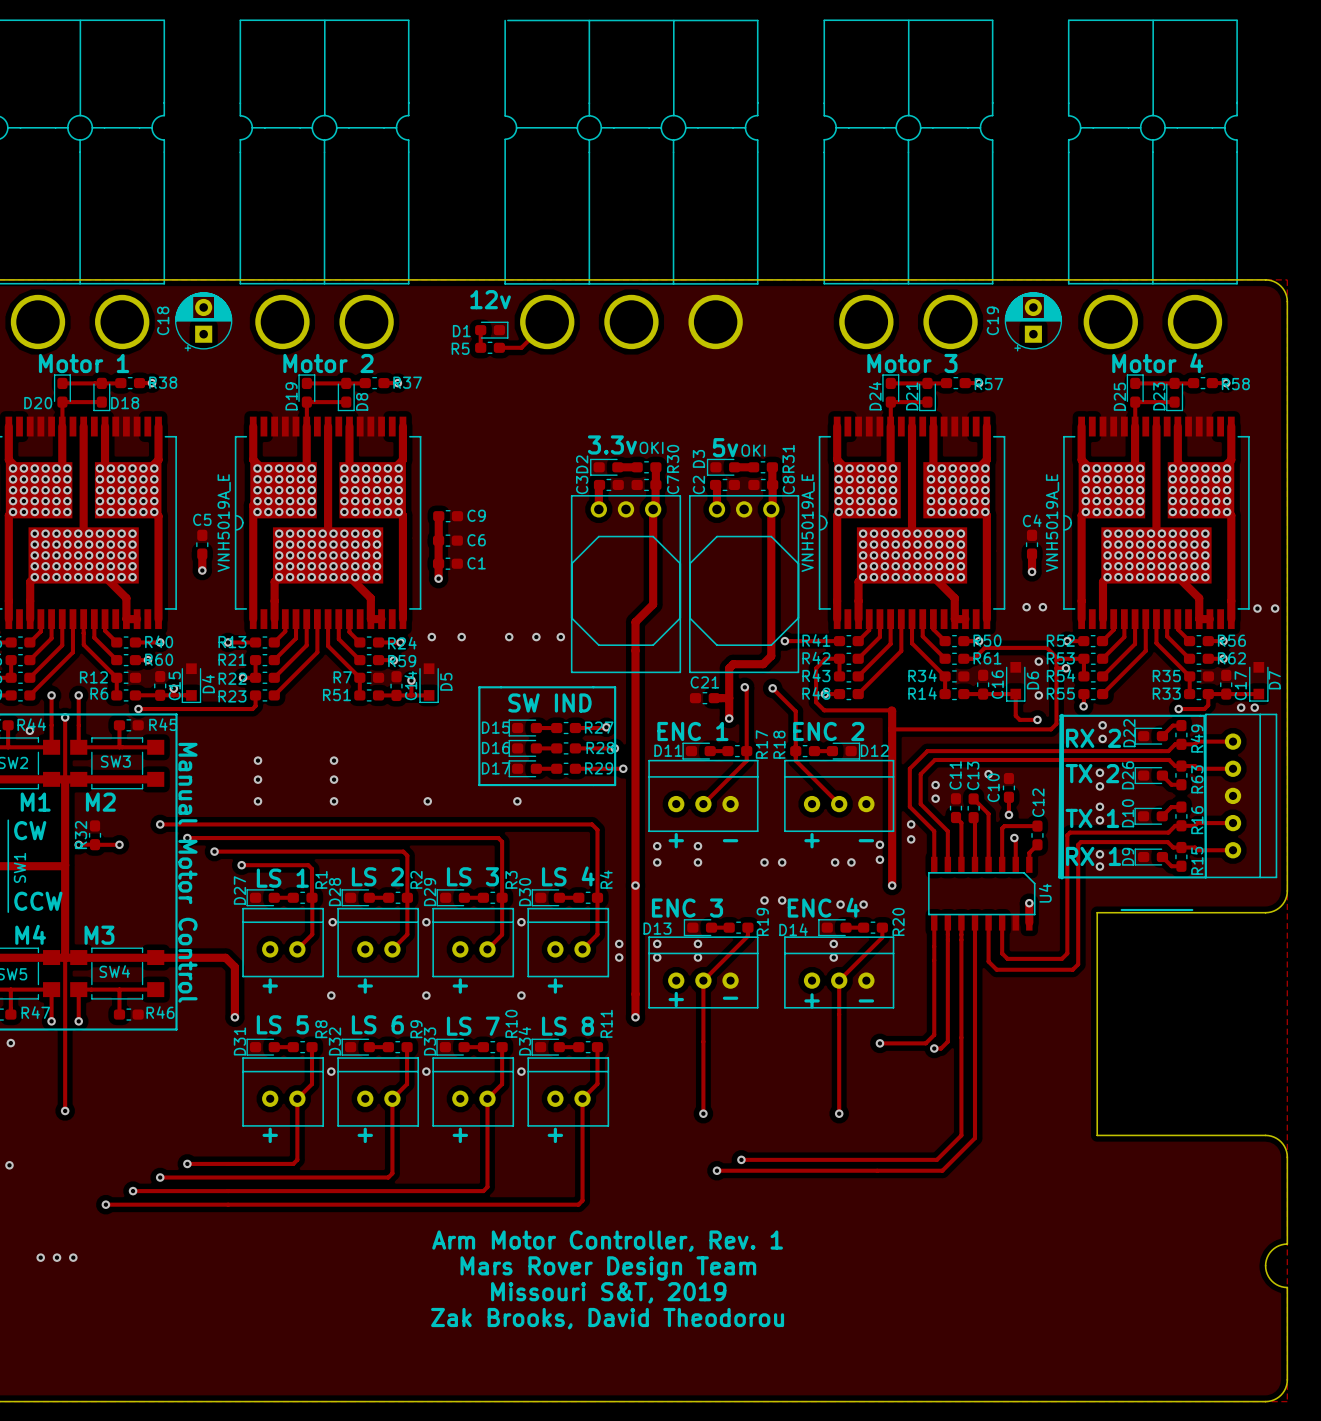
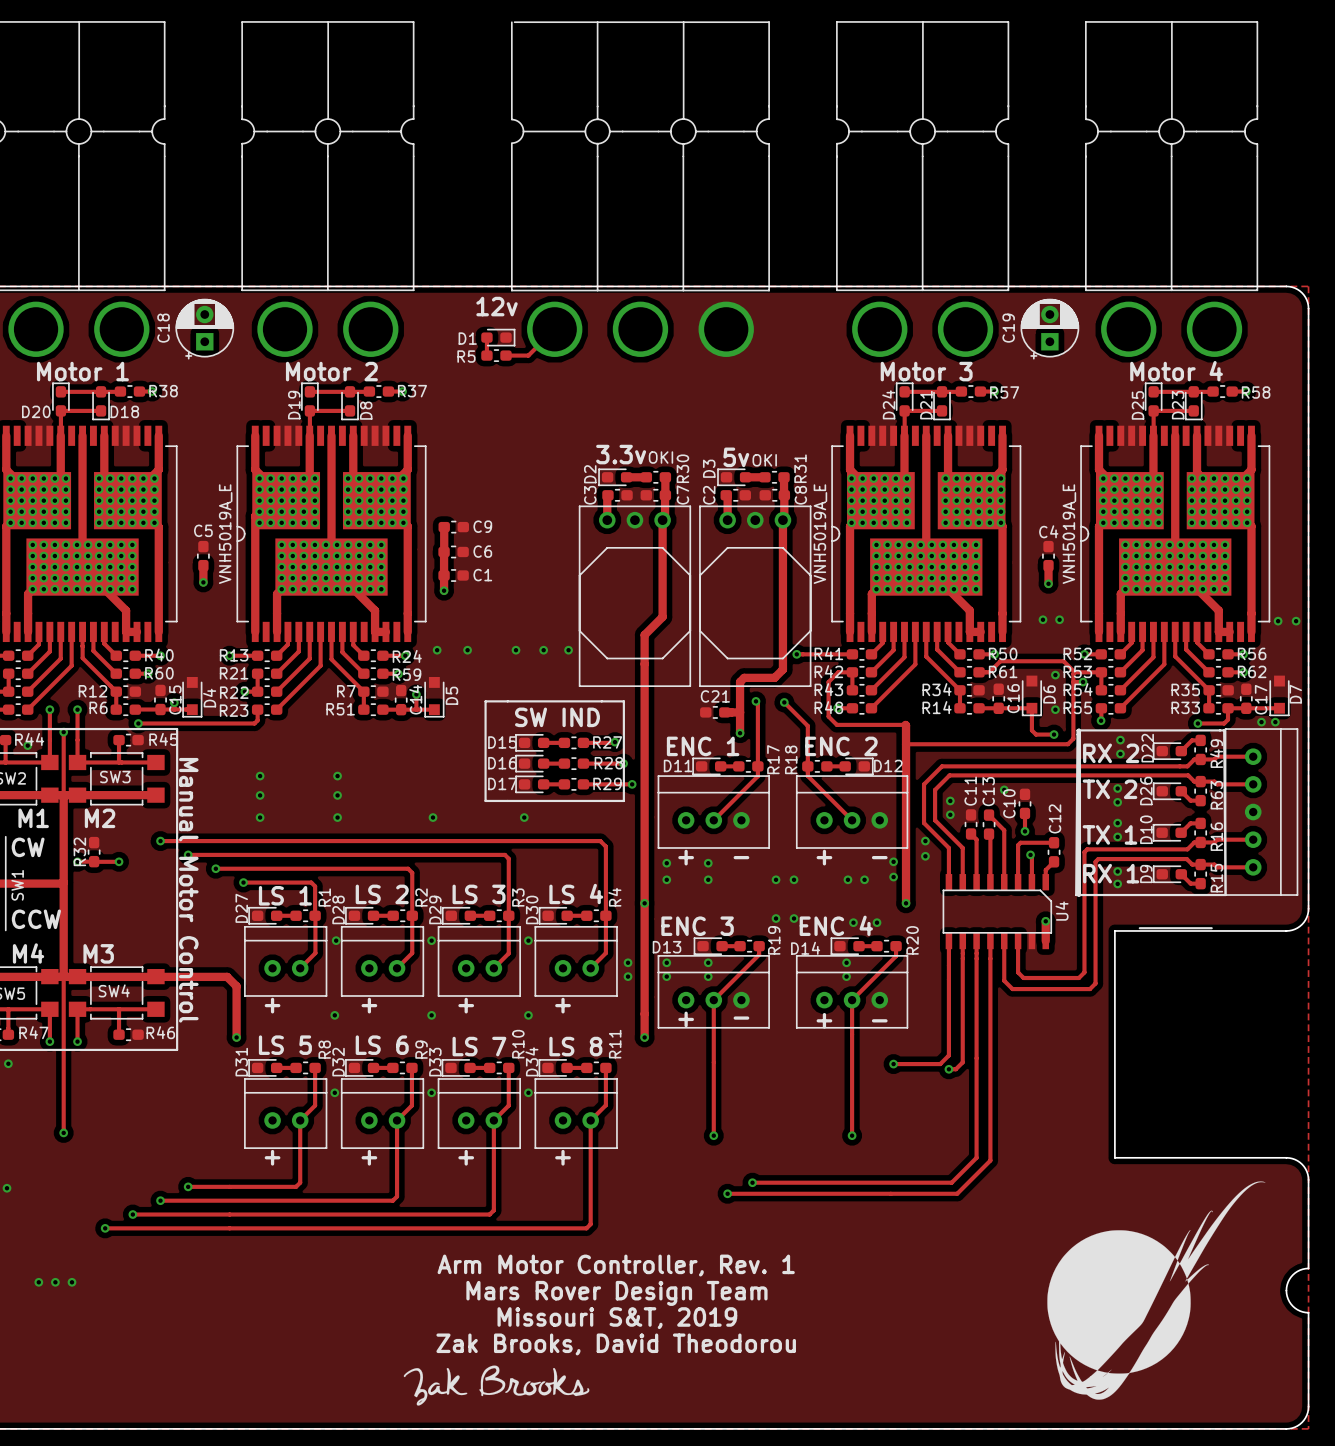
drawing: none -> [1047, 1181, 1266, 1400]
drawing: none -> [403, 1365, 590, 1406]

